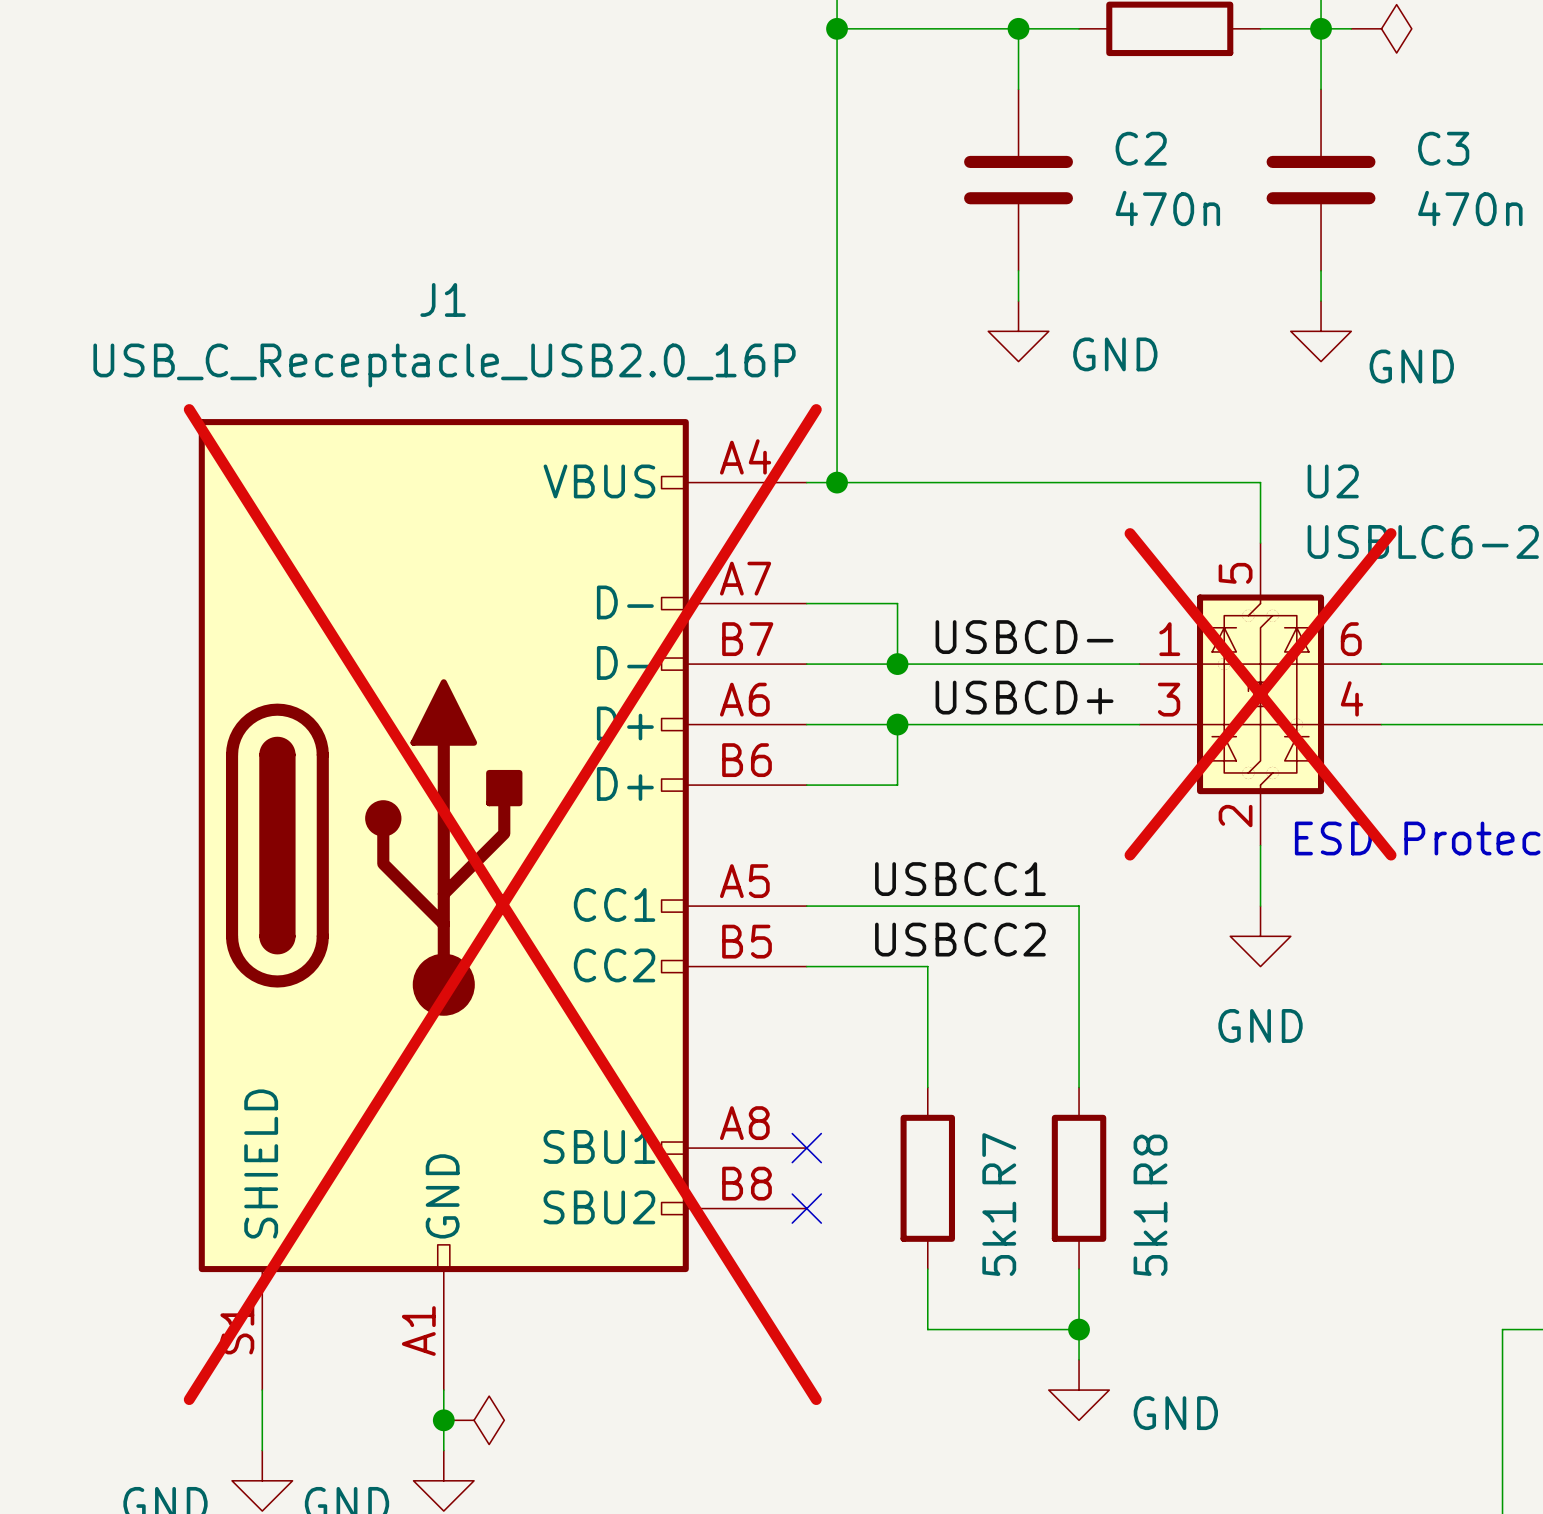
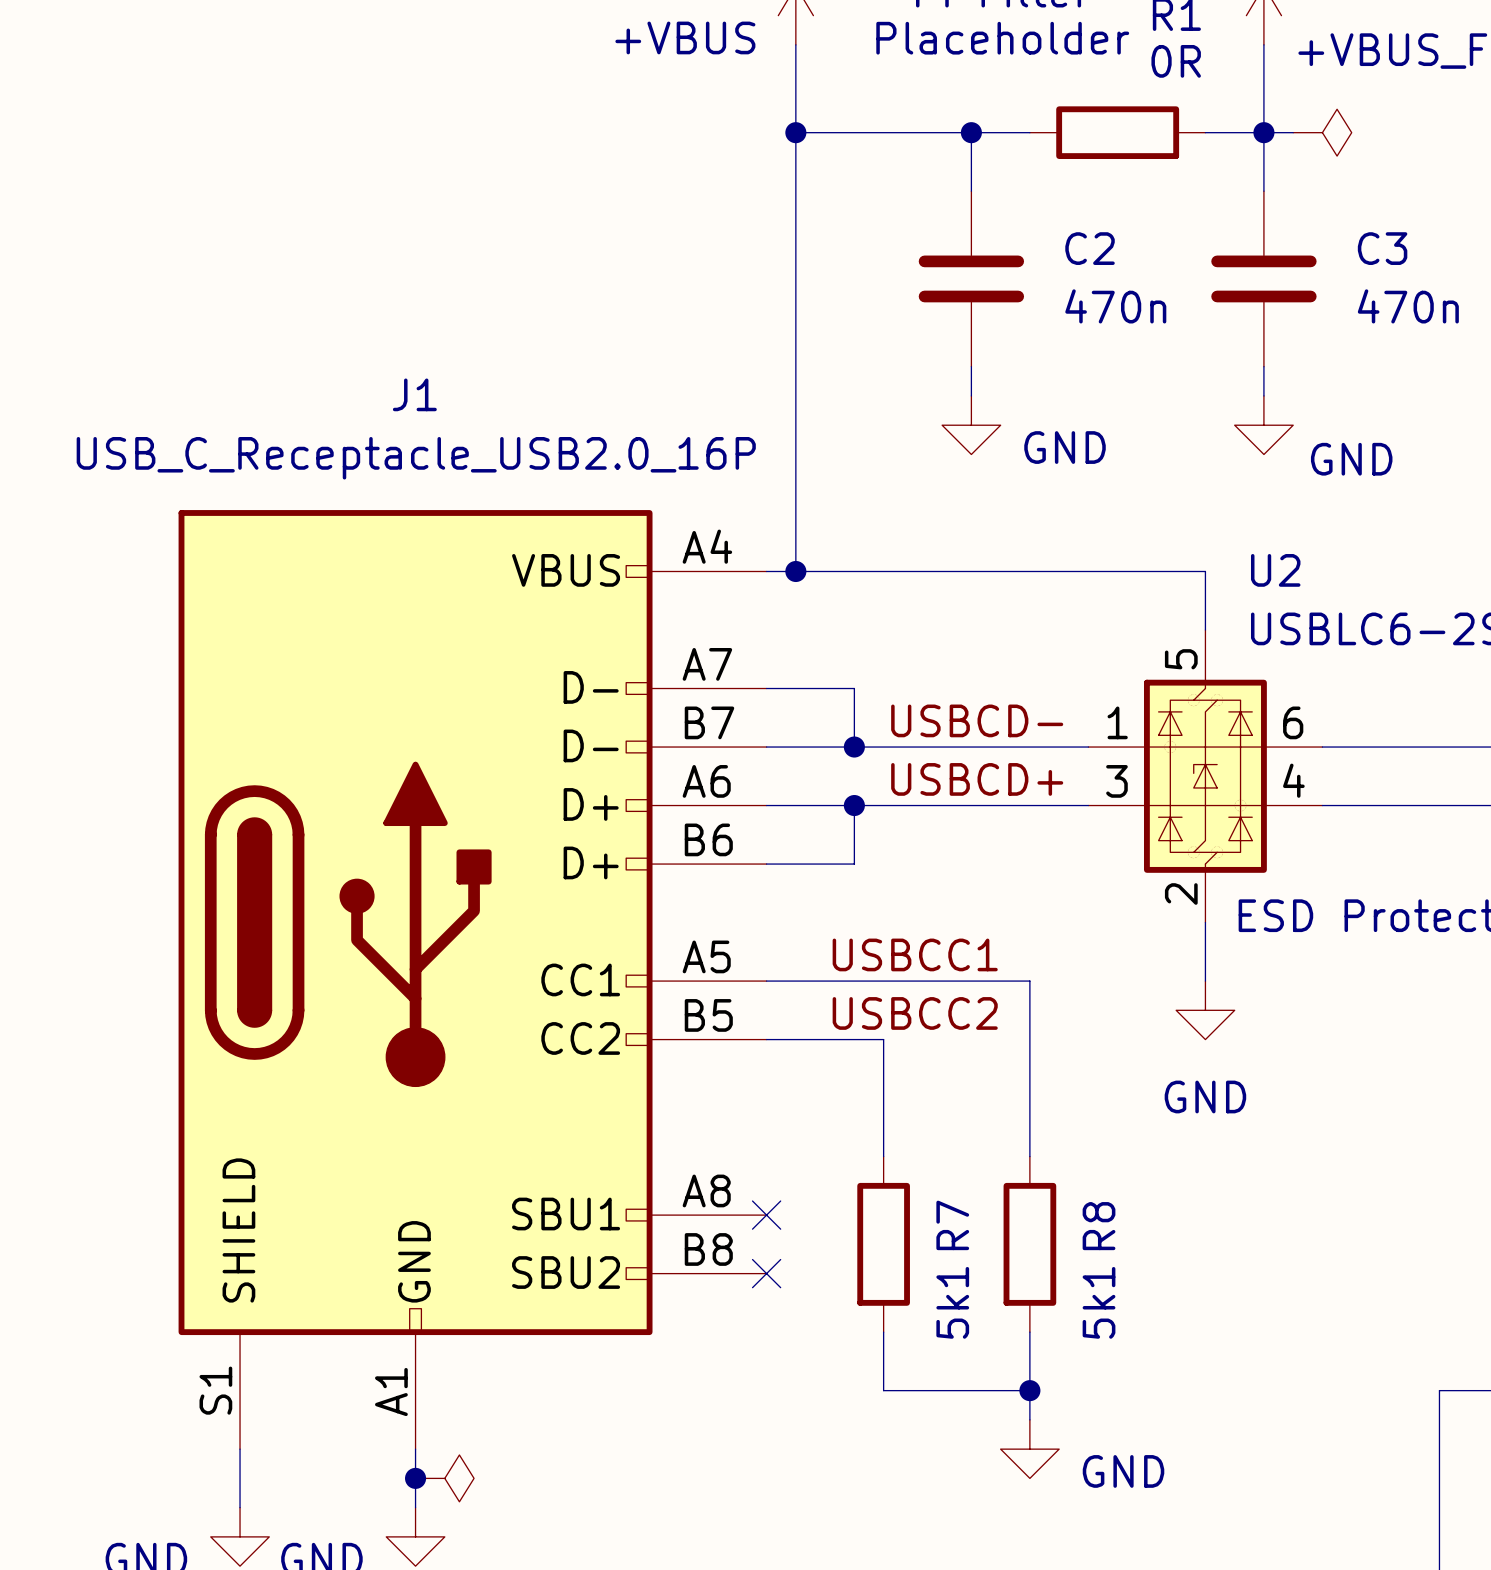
U2 do-not-place cross: (1260, 694) -> none
J1 do-not-place cross: (502, 904) -> none

